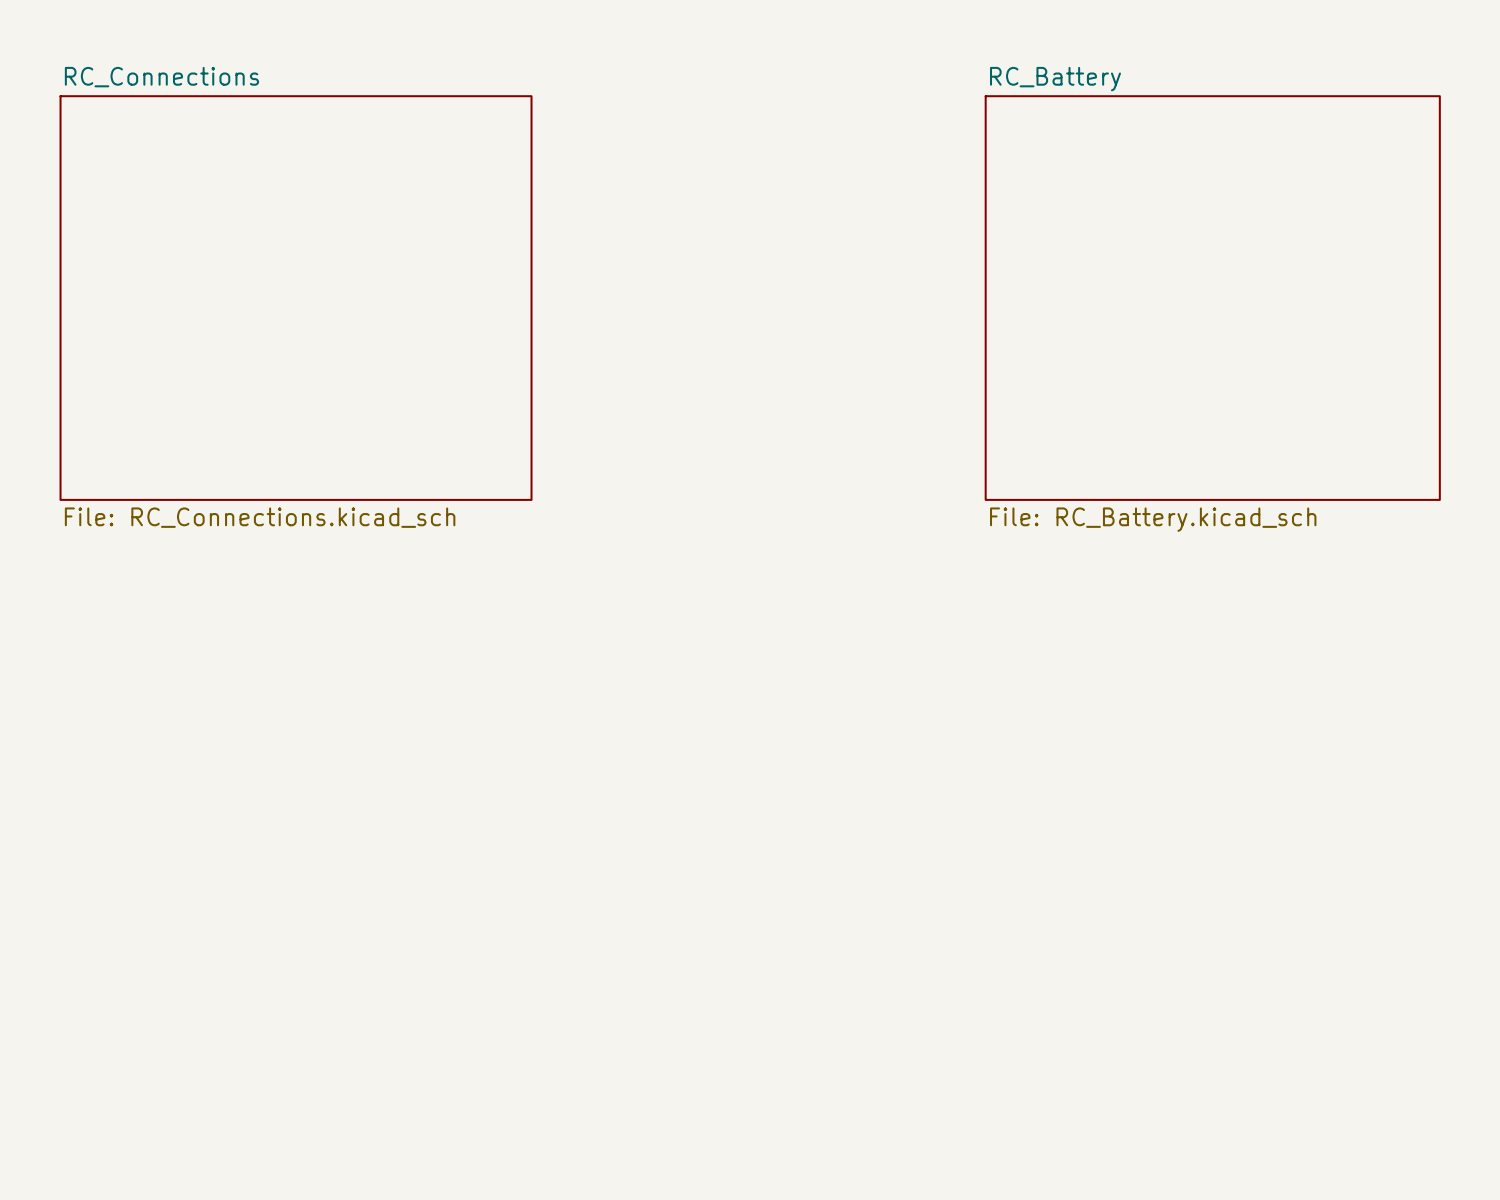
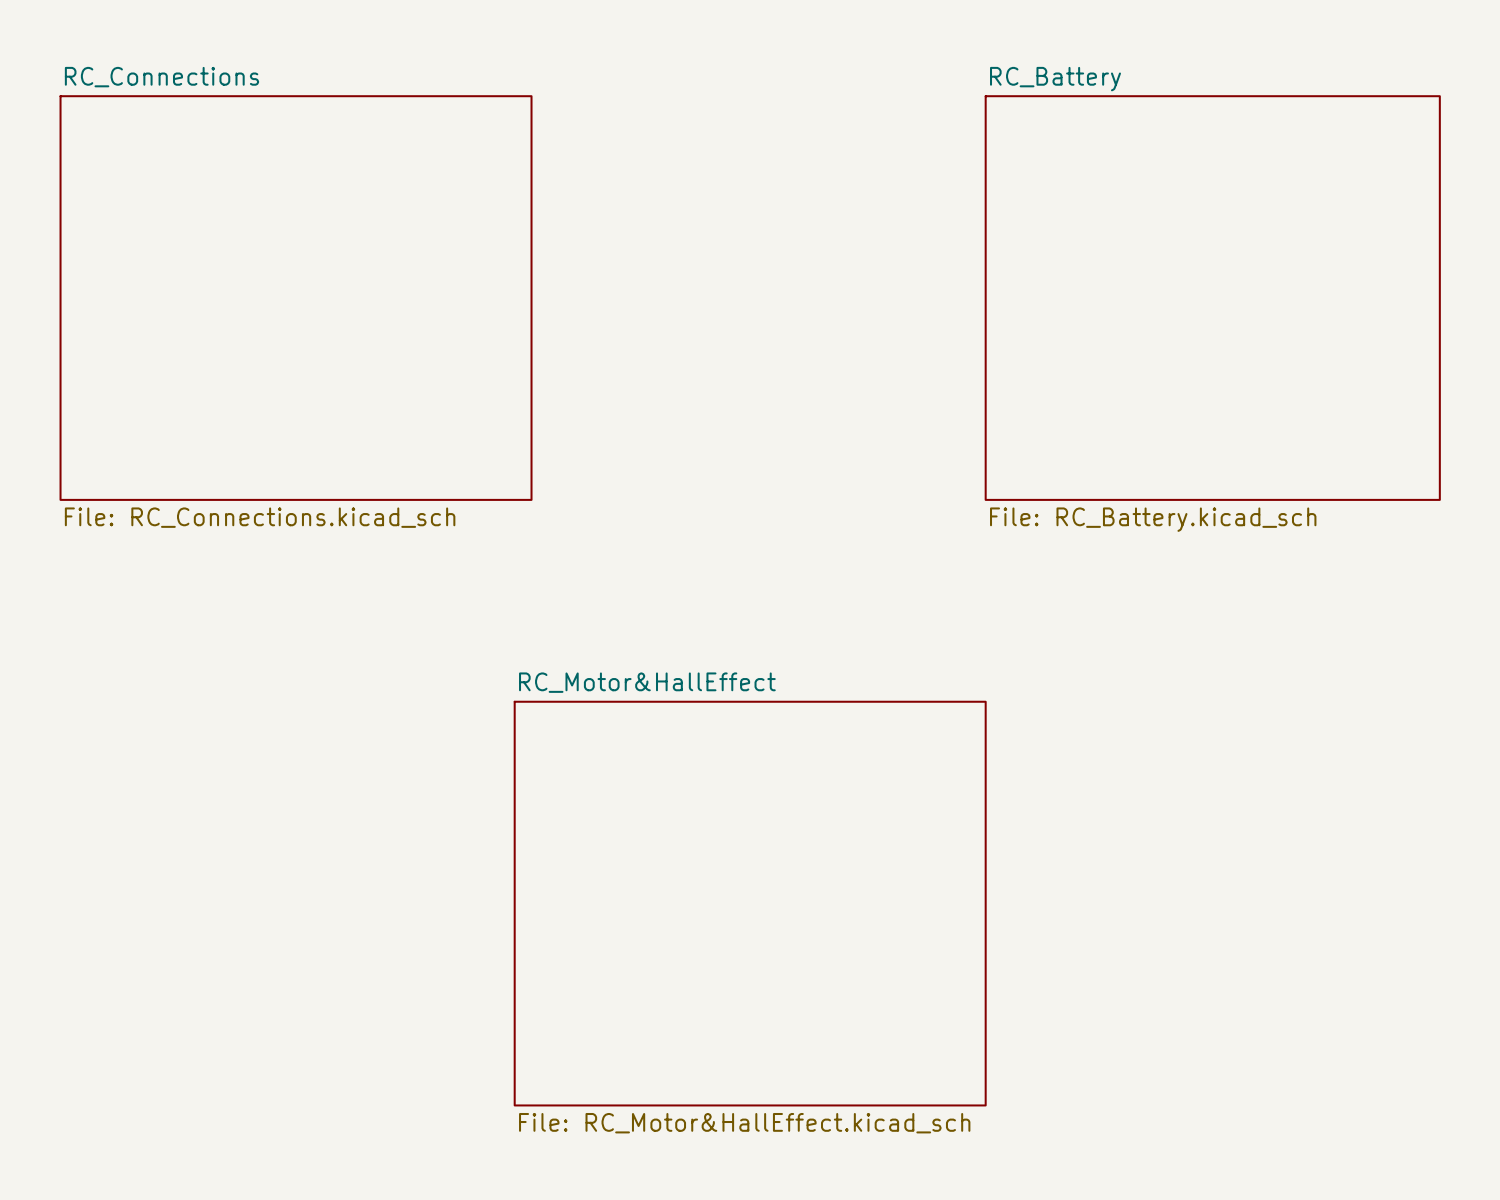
sheet RC_Motor&HallEffect: none -> File: RC_Motor&HallEffect.kicad_sch (750, 903)

